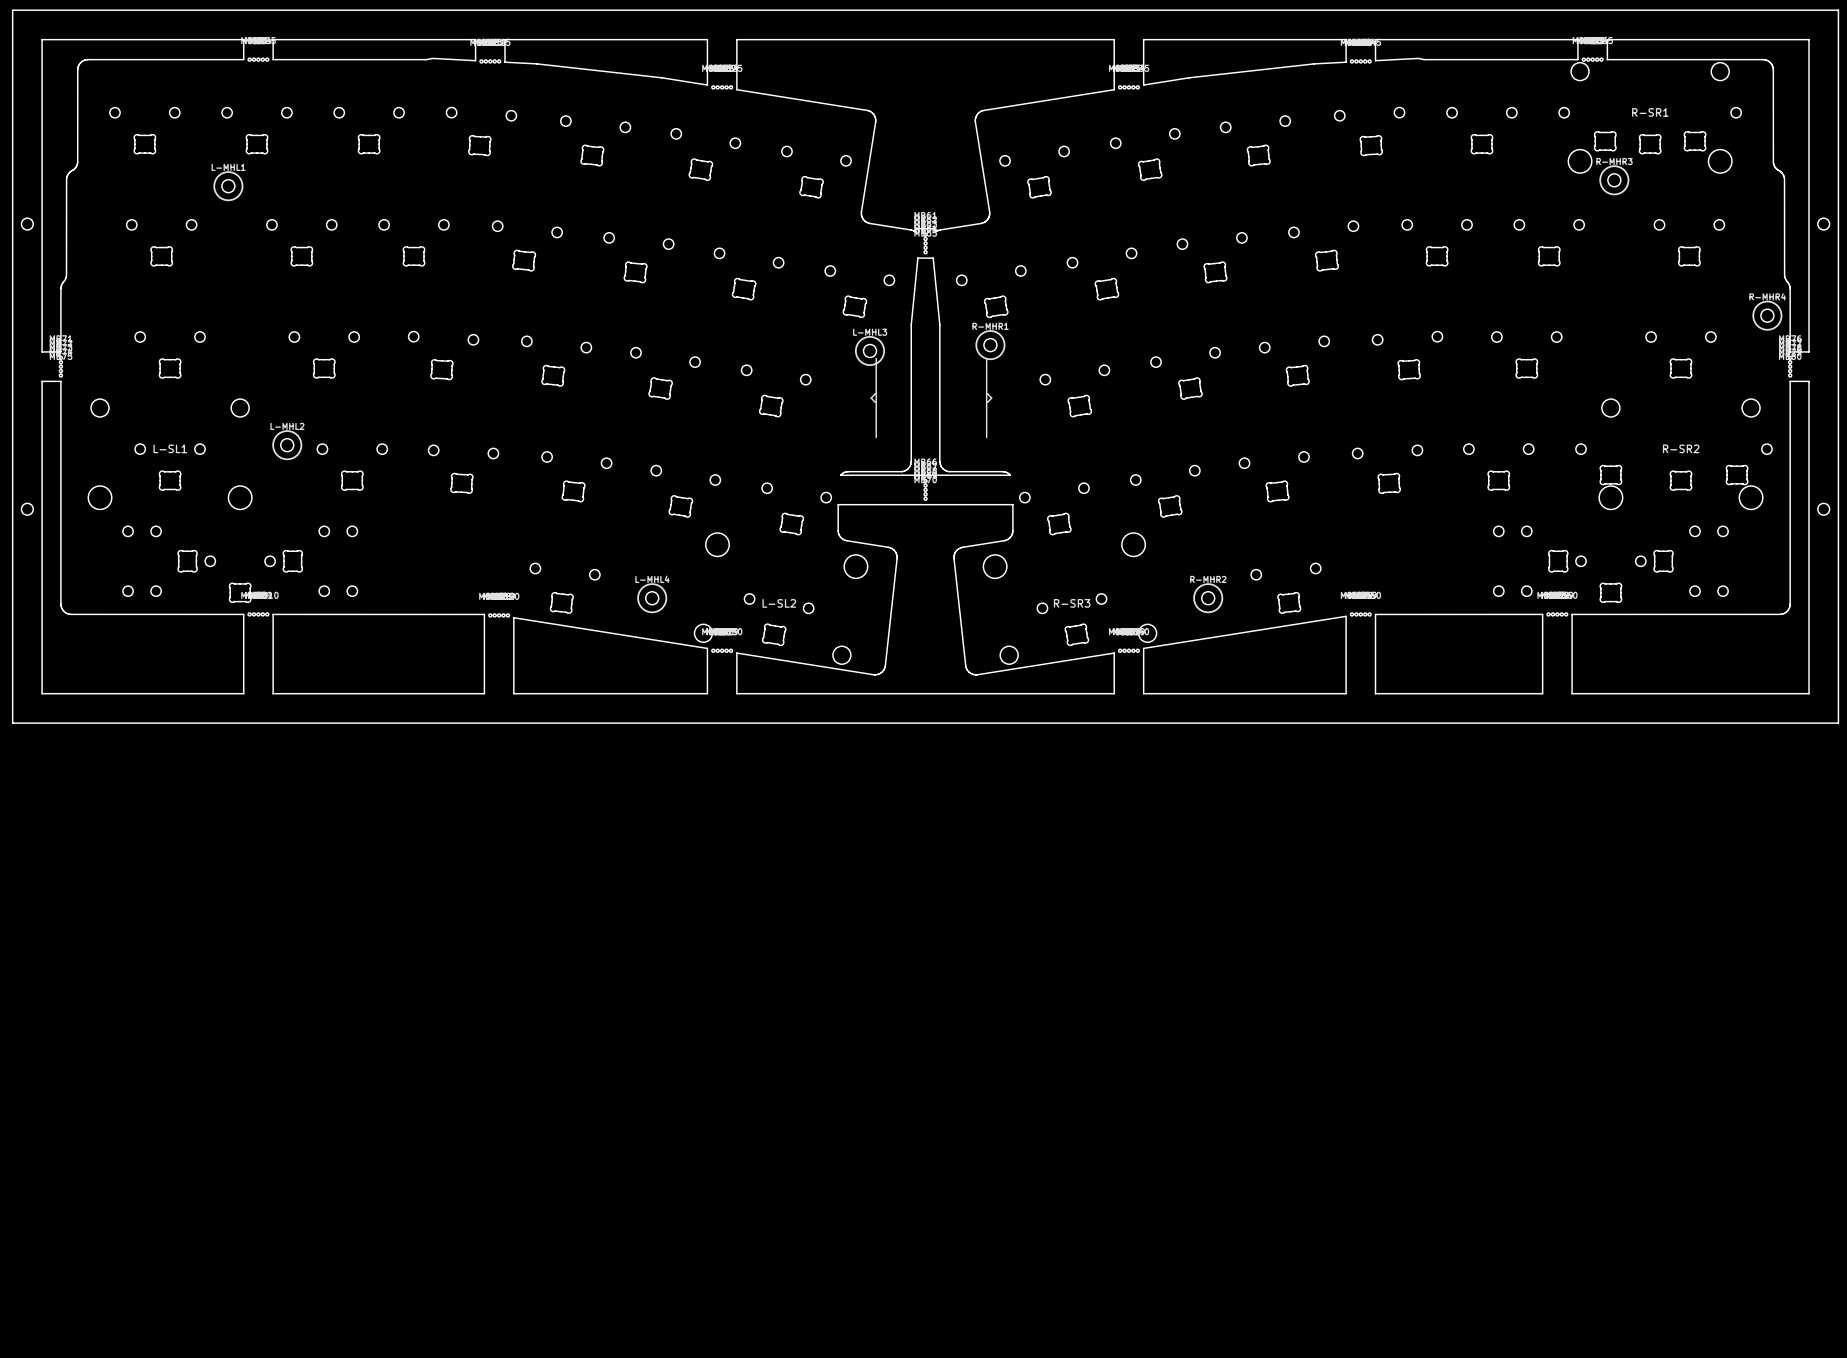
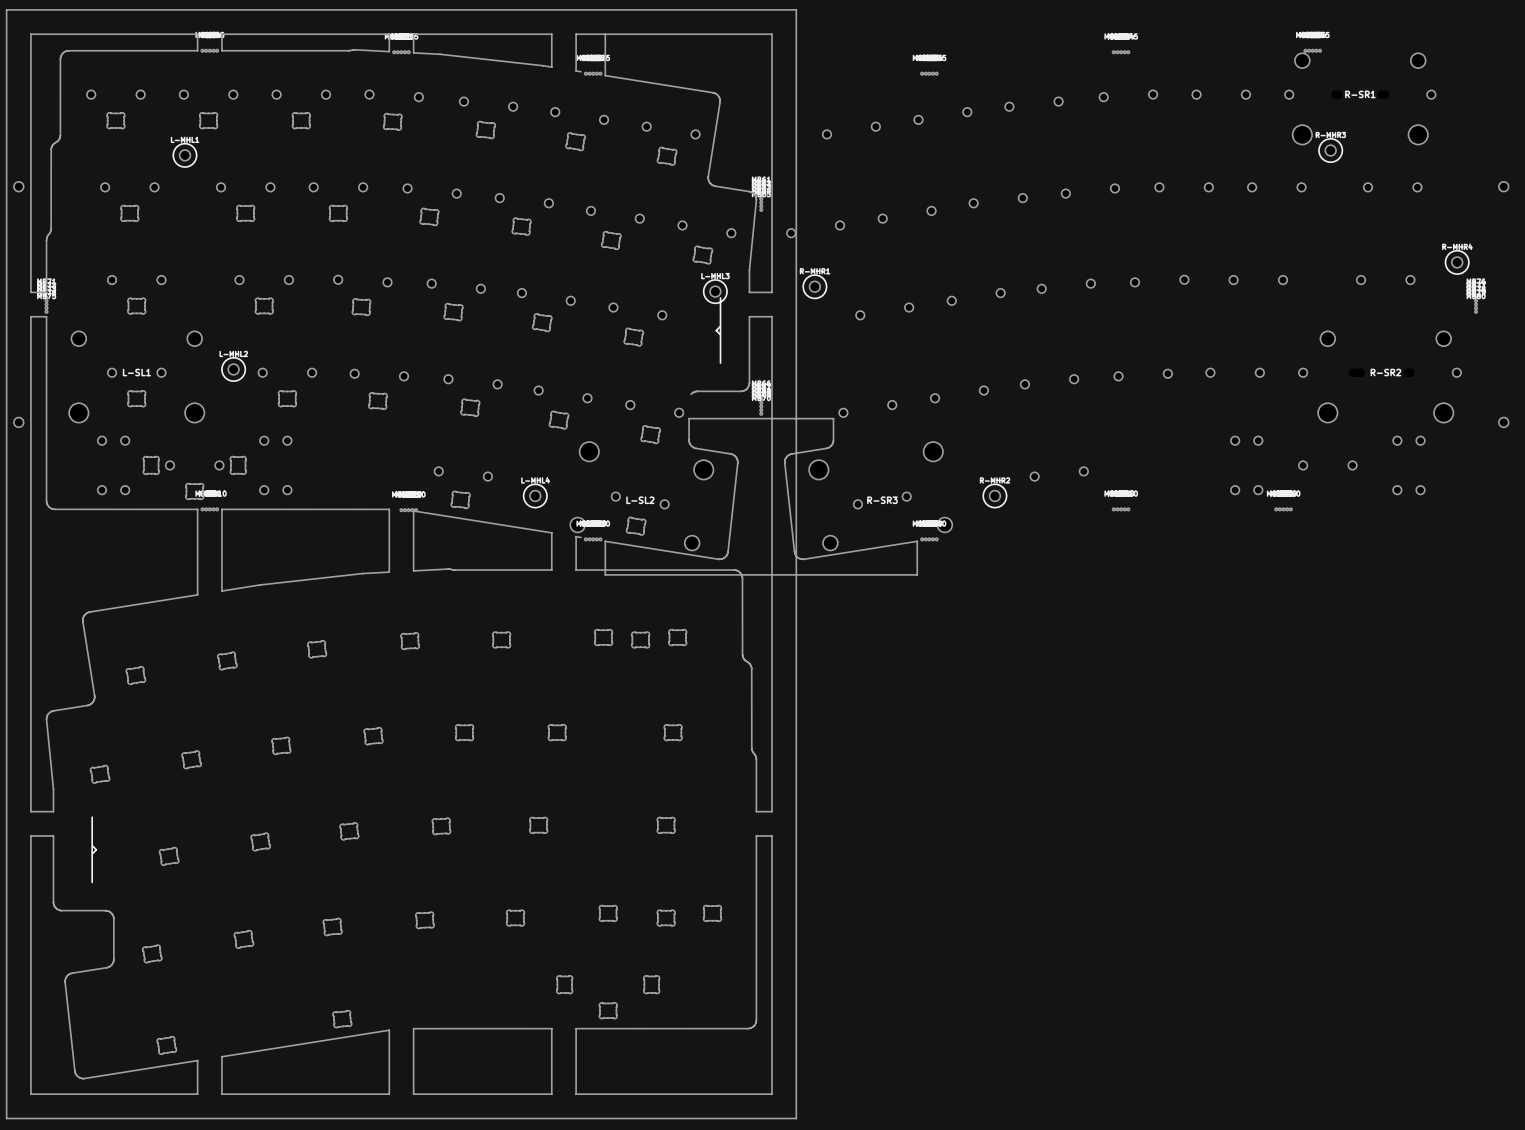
board edge: (967, 10) (1838, 10) (1838, 723) (12, 723) -> (796, 9) (796, 1118) (6, 1118) (6, 599)
board edge: (672, 39) (701, 39) -> (551, 34) (551, 67)
board edge: (707, 39) (707, 85) -> (580, 34) (605, 34)
board edge: (938, 39) (1114, 39) (1114, 89) (979, 112) (975, 121) (989, 211) (988, 218) (982, 223) (935, 232) (935, 228) (915, 228) (915, 232) -> (771, 34) (771, 292) (749, 292)
board edge: (1143, 39) (1346, 39) (1346, 62) (1189, 77) (1143, 85) (1143, 39) -> none
board edge: (1375, 39) (1577, 39) (1577, 59) (1417, 58) (1375, 60) (1375, 39) -> none
board edge: (1607, 39) (1607, 59) (1763, 59) (1772, 65) (1773, 162) (1784, 178) (1784, 275) (1790, 288) (1790, 351) (1809, 351) (1809, 39) (1607, 39) -> none
board edge: (672, 79) (701, 84) -> (576, 34) (576, 70)
part: (1605, 141) -> none
part: (1695, 141) -> none
part: (1481, 144) -> none
part: (1650, 144) -> none
part: (1371, 145) -> none
part: (1258, 155) -> none
part: (1150, 169) -> none
part: (1039, 187) -> none
part: (1437, 256) -> none
part: (1549, 256) -> none
part: (1689, 256) -> none
board edge: (917, 258) (933, 258) (939, 324) (941, 466) (949, 471) (1002, 471) (1010, 475) (840, 475) -> (754, 214) (756, 199) (753, 193)
part: (1326, 260) -> none
part: (1215, 272) -> none
part: (1106, 289) -> none
part: (996, 306) -> none
board edge: (911, 351) (911, 381) -> none
part: (1526, 368) -> none
part: (1680, 368) -> none
part: (1409, 369) -> none
part: (1297, 375) -> none
board edge: (1790, 381) (1790, 604) (1788, 609) (1779, 614) (1572, 614) (1572, 693) (1809, 693) (1809, 381) (1790, 381) -> none
part: (1190, 388) -> none
part: (989, 398) -> none
part: (1079, 406) -> none
part: (1610, 475) -> none
part: (1737, 475) -> none
part: (1498, 480) -> none
part: (1680, 480) -> none
part: (1389, 483) -> none
part: (1277, 491) -> none
part: (1170, 506) -> none
part: (1059, 524) -> none
part: (1558, 561) -> none
part: (1663, 561) -> none
part: (1610, 592) -> none
part: (1289, 602) -> none
board edge: (475, 614) (484, 614) (484, 693) (273, 693) -> (389, 509) (389, 572) (259, 585) (221, 591) (221, 574)
board edge: (1375, 614) (1542, 614) (1542, 693) (1375, 693) (1375, 614) -> none
board edge: (1346, 616) (1143, 648) (1143, 693) (1346, 693) (1346, 616) -> none
board edge: (513, 617) (513, 693) (707, 693) (707, 648) -> (420, 512) (413, 510) (413, 570) (448, 569) (551, 570) (551, 532)
part: (1076, 634) -> none
board edge: (672, 642) (701, 647) -> (749, 316) (771, 316) (771, 811) (756, 811) (756, 759) (751, 748) (751, 668) (742, 654) (742, 578) (740, 573) (733, 570) (576, 570) (576, 536)
board edge: (42, 693) (243, 693) -> (30, 574) (30, 811) (53, 811) (53, 789) (46, 719) (48, 714) (53, 710) (88, 705) (94, 699) (82, 621) (83, 616) (89, 611) (197, 594) (197, 574)
part: none -> (603, 637)
part: none -> (677, 637)
part: none -> (501, 639)
part: none -> (640, 639)
part: none -> (410, 641)
part: none -> (317, 649)
part: none -> (227, 660)
part: none -> (135, 675)
part: none -> (464, 732)
part: none -> (557, 732)
part: none -> (673, 732)
part: none -> (373, 736)
part: none -> (281, 745)
part: none -> (191, 759)
part: none -> (100, 774)
part: none -> (538, 825)
part: none -> (666, 825)
part: none -> (441, 826)
part: none -> (349, 831)
board edge: none -> (30, 835) (53, 835) (53, 902) (55, 908) (61, 910) (106, 910) (110, 912) (113, 917) (113, 959) (111, 964) (106, 967) (70, 973) (65, 980) (76, 1074) (83, 1078) (197, 1060) (197, 1094) (30, 1094) (30, 835)
board edge: none -> (756, 835) (754, 1024) (747, 1028) (576, 1028) (576, 1094) (771, 1094) (771, 835) (756, 835)
part: none -> (260, 841)
part: none -> (94, 849)
part: none -> (169, 856)
part: none -> (608, 913)
part: none -> (712, 913)
part: none -> (515, 918)
part: none -> (666, 918)
part: none -> (424, 920)
part: none -> (332, 926)
part: none -> (243, 939)
part: none -> (152, 953)
part: none -> (564, 984)
part: none -> (651, 984)
part: none -> (608, 1010)
part: none -> (342, 1019)
board edge: none -> (551, 1028) (413, 1028) (413, 1094) (551, 1094) (551, 1028)
board edge: none -> (389, 1030) (221, 1056) (221, 1094) (389, 1094) (389, 1030)
part: none -> (166, 1045)

